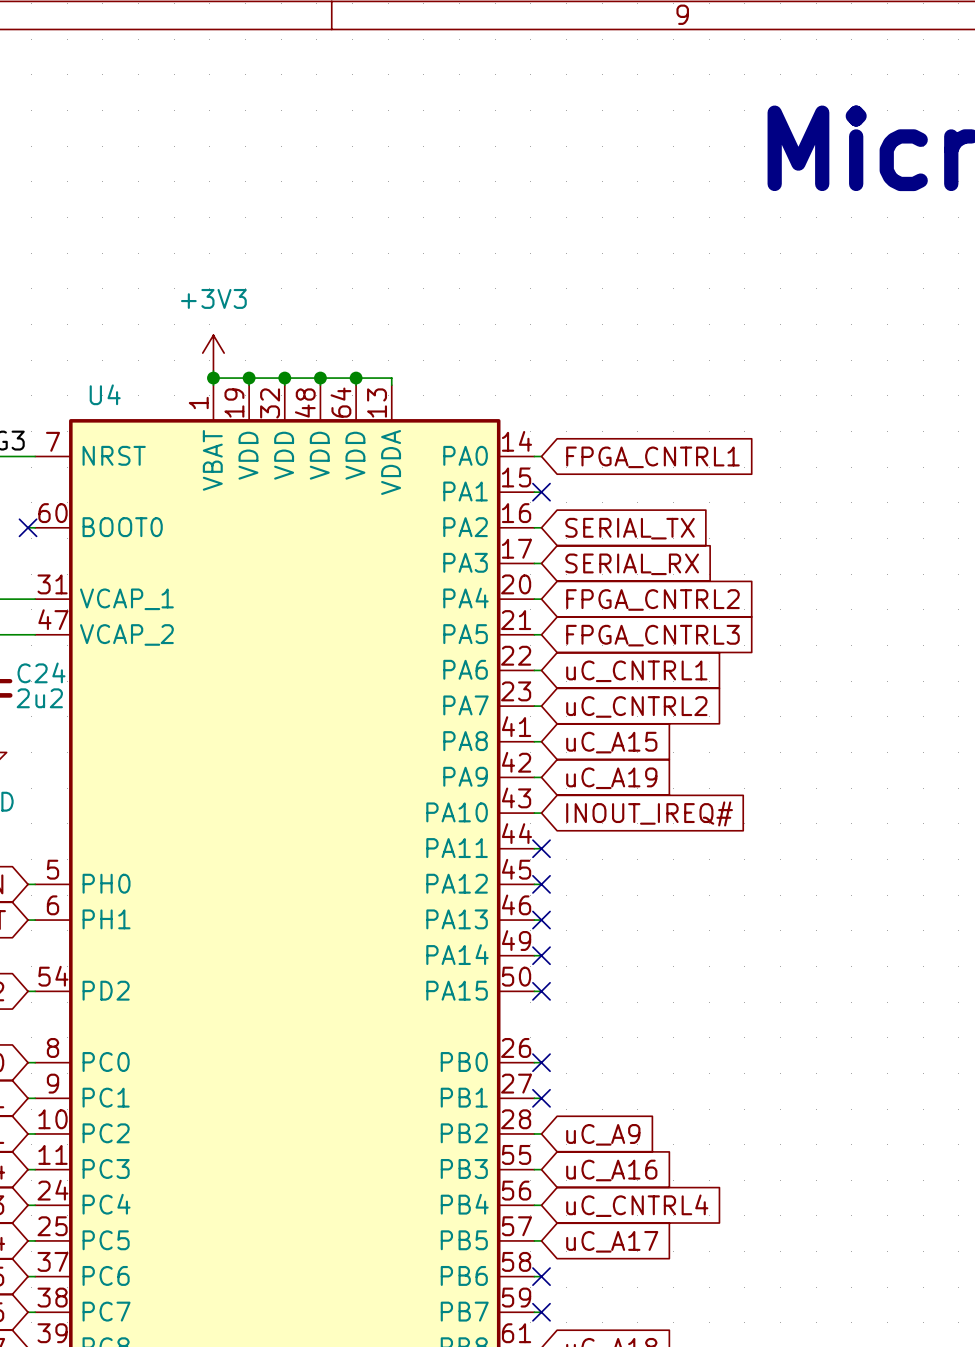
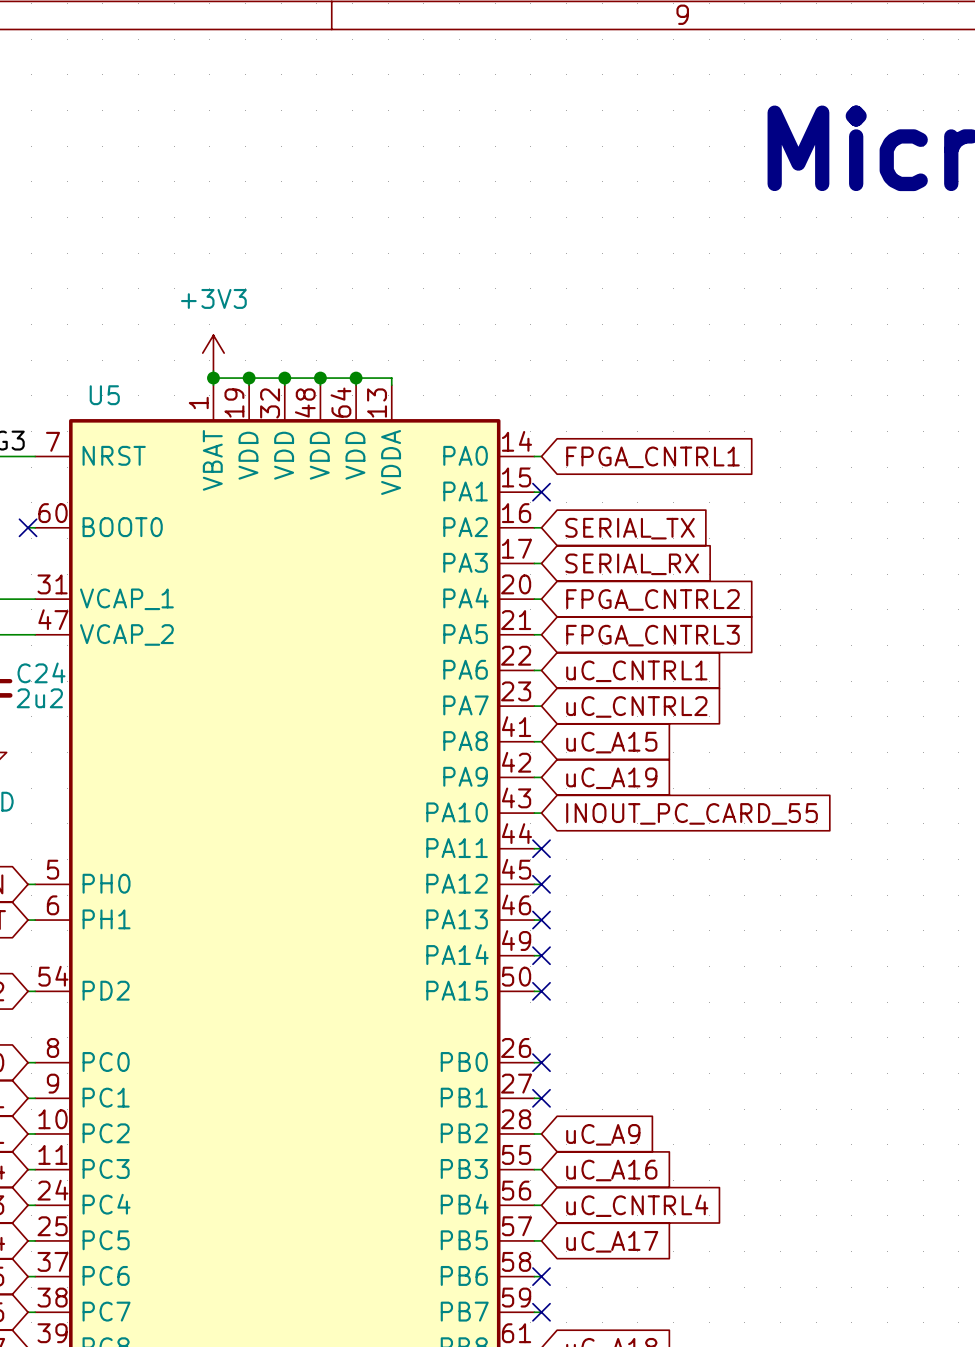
U4 name: U4 (105, 394) -> U5 (104, 395)
global label: INOUT_IREQ# (649, 813) -> INOUT_PC_CARD_55 (692, 813)

